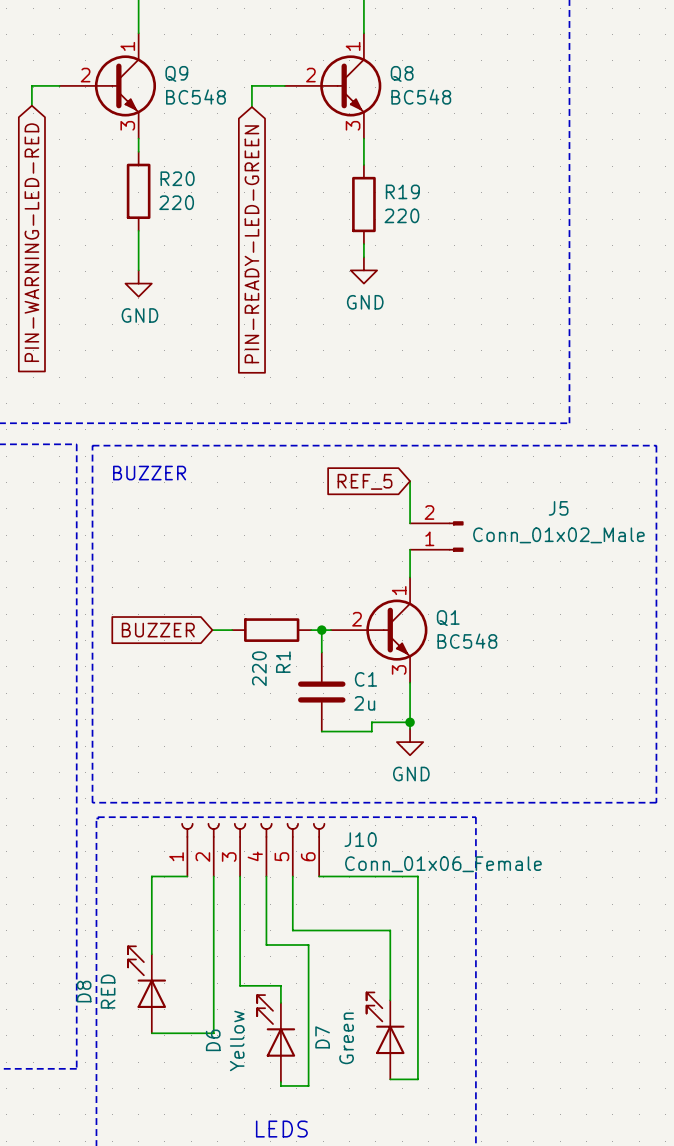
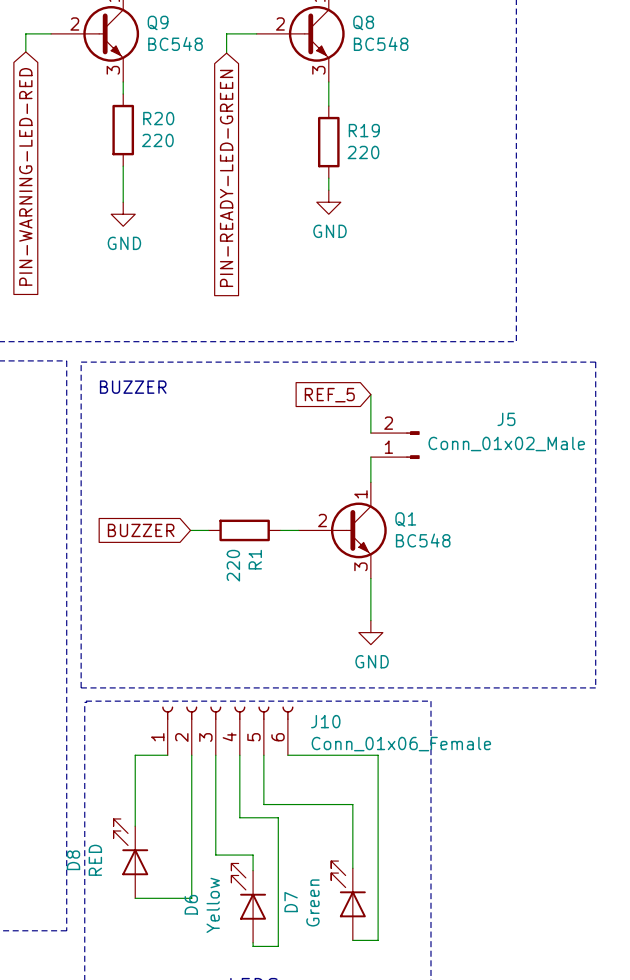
wire: (321, 630) (321, 652) -> none
junction: (321, 630) -> none
C1: 2u (321, 692) -> none
wire: (410, 722) (371, 722) (371, 731) (321, 731) -> none
junction: (410, 722) -> none

